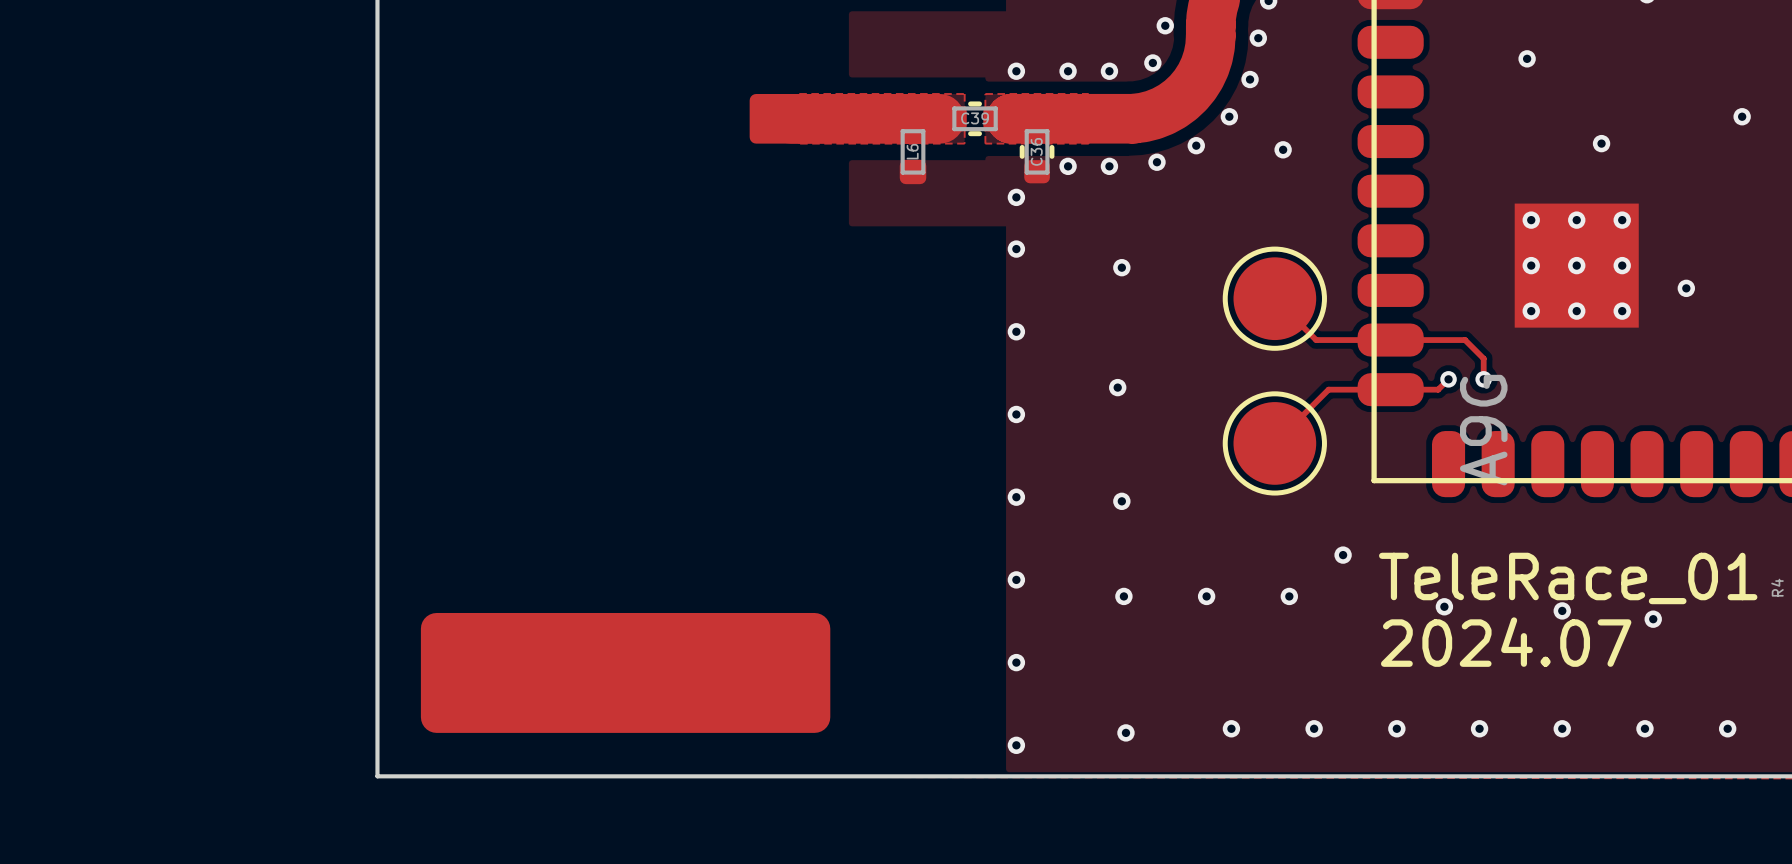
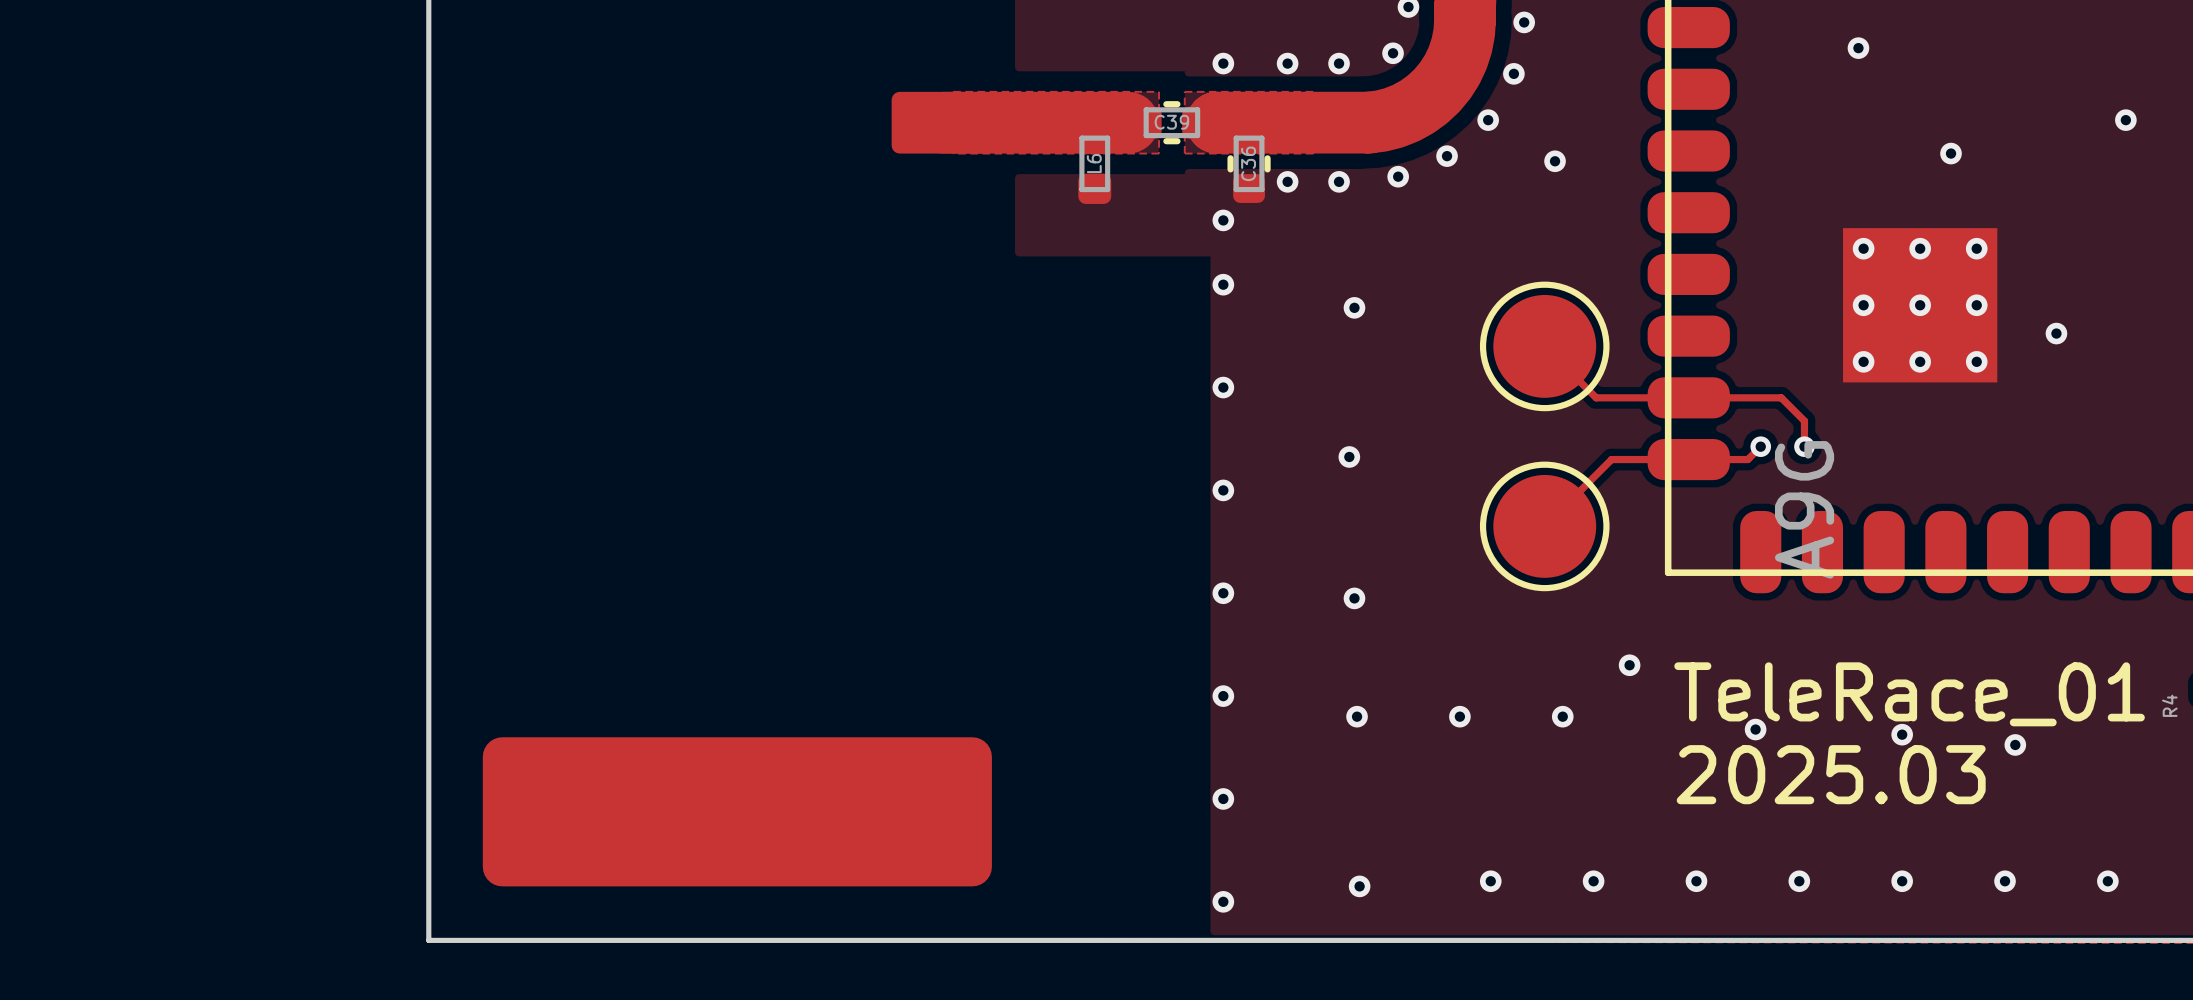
text: 2024.07 (1506, 642) -> 2025.03 (1831, 774)

